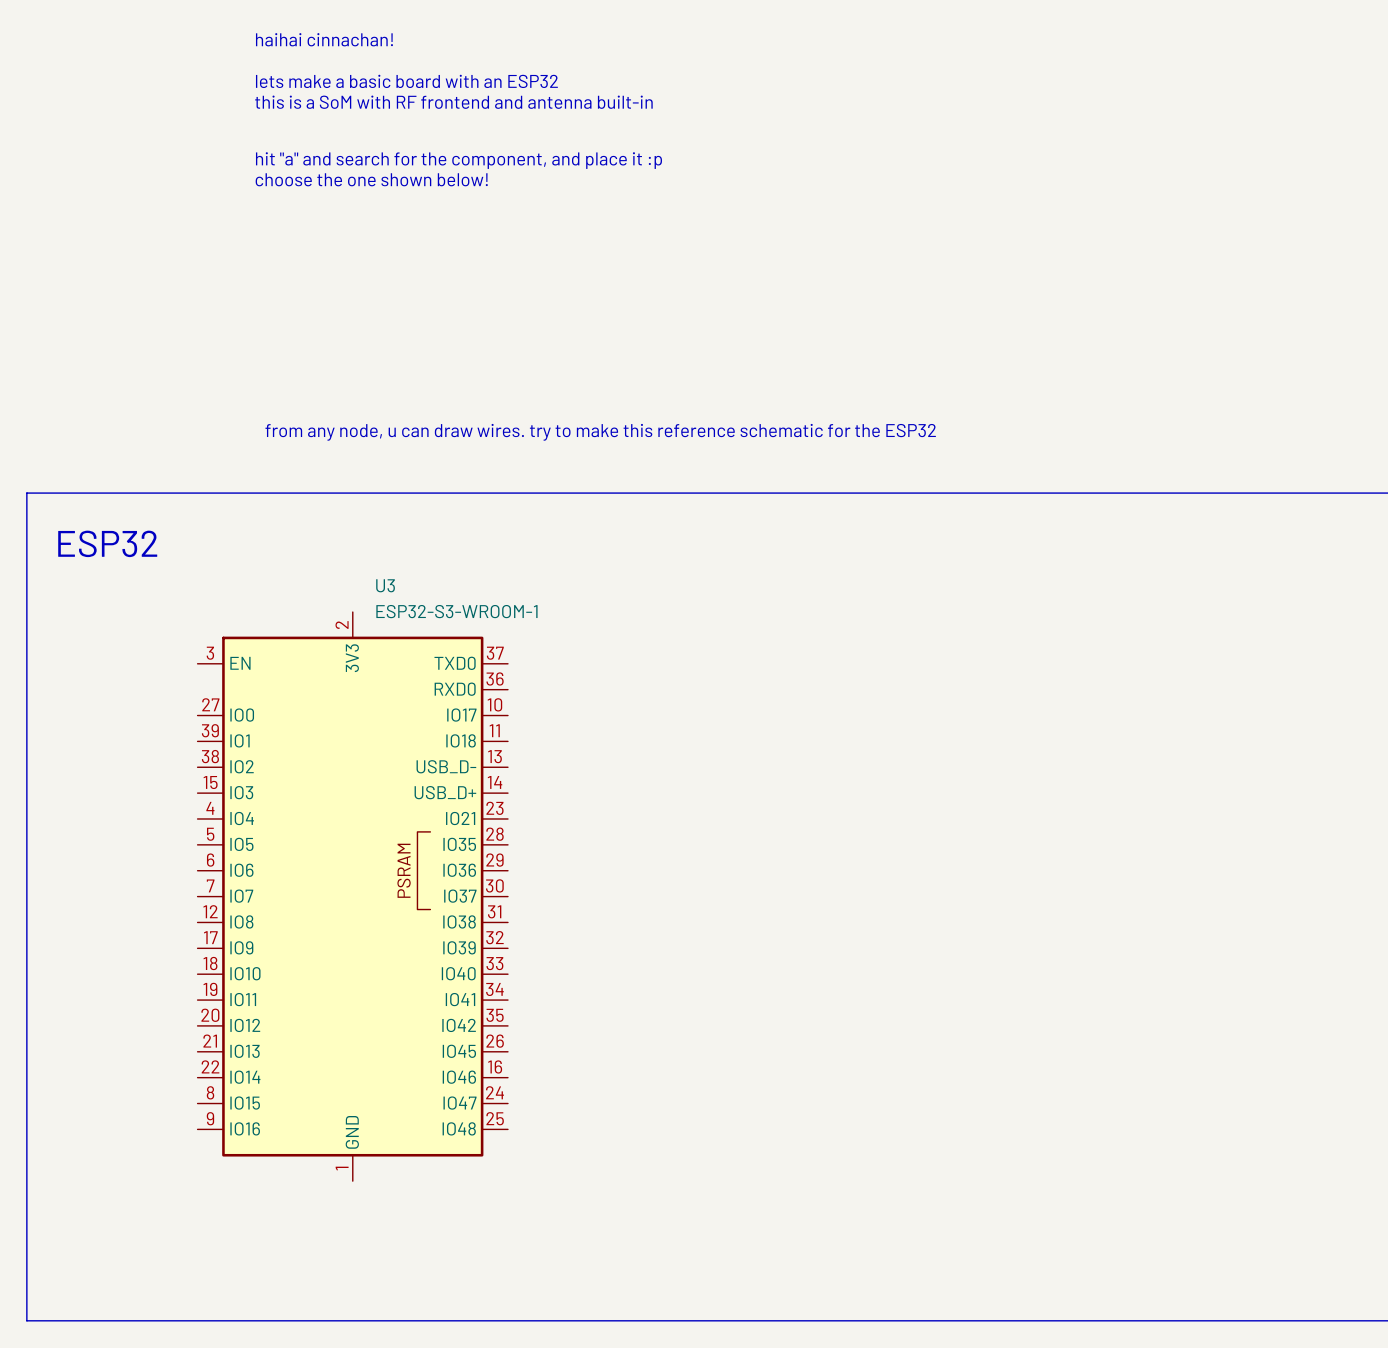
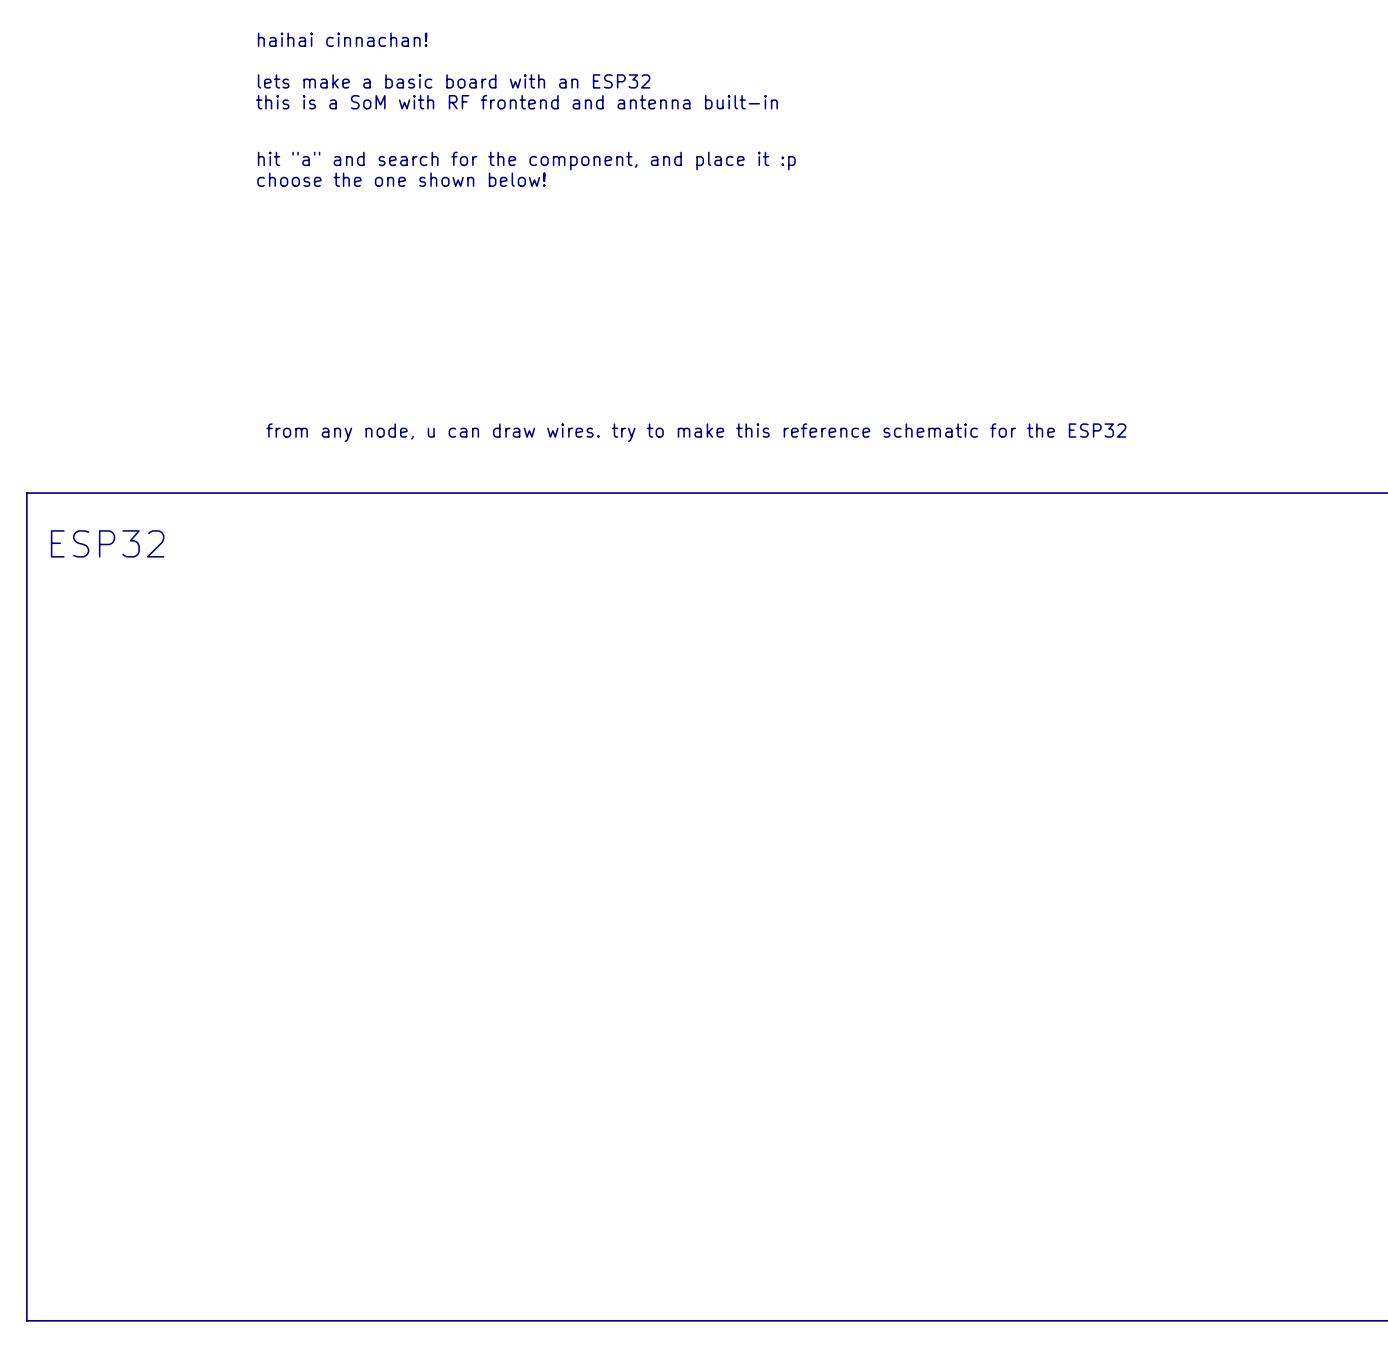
U3: ESP32-S3-WROOM-1 (352, 896) -> none

